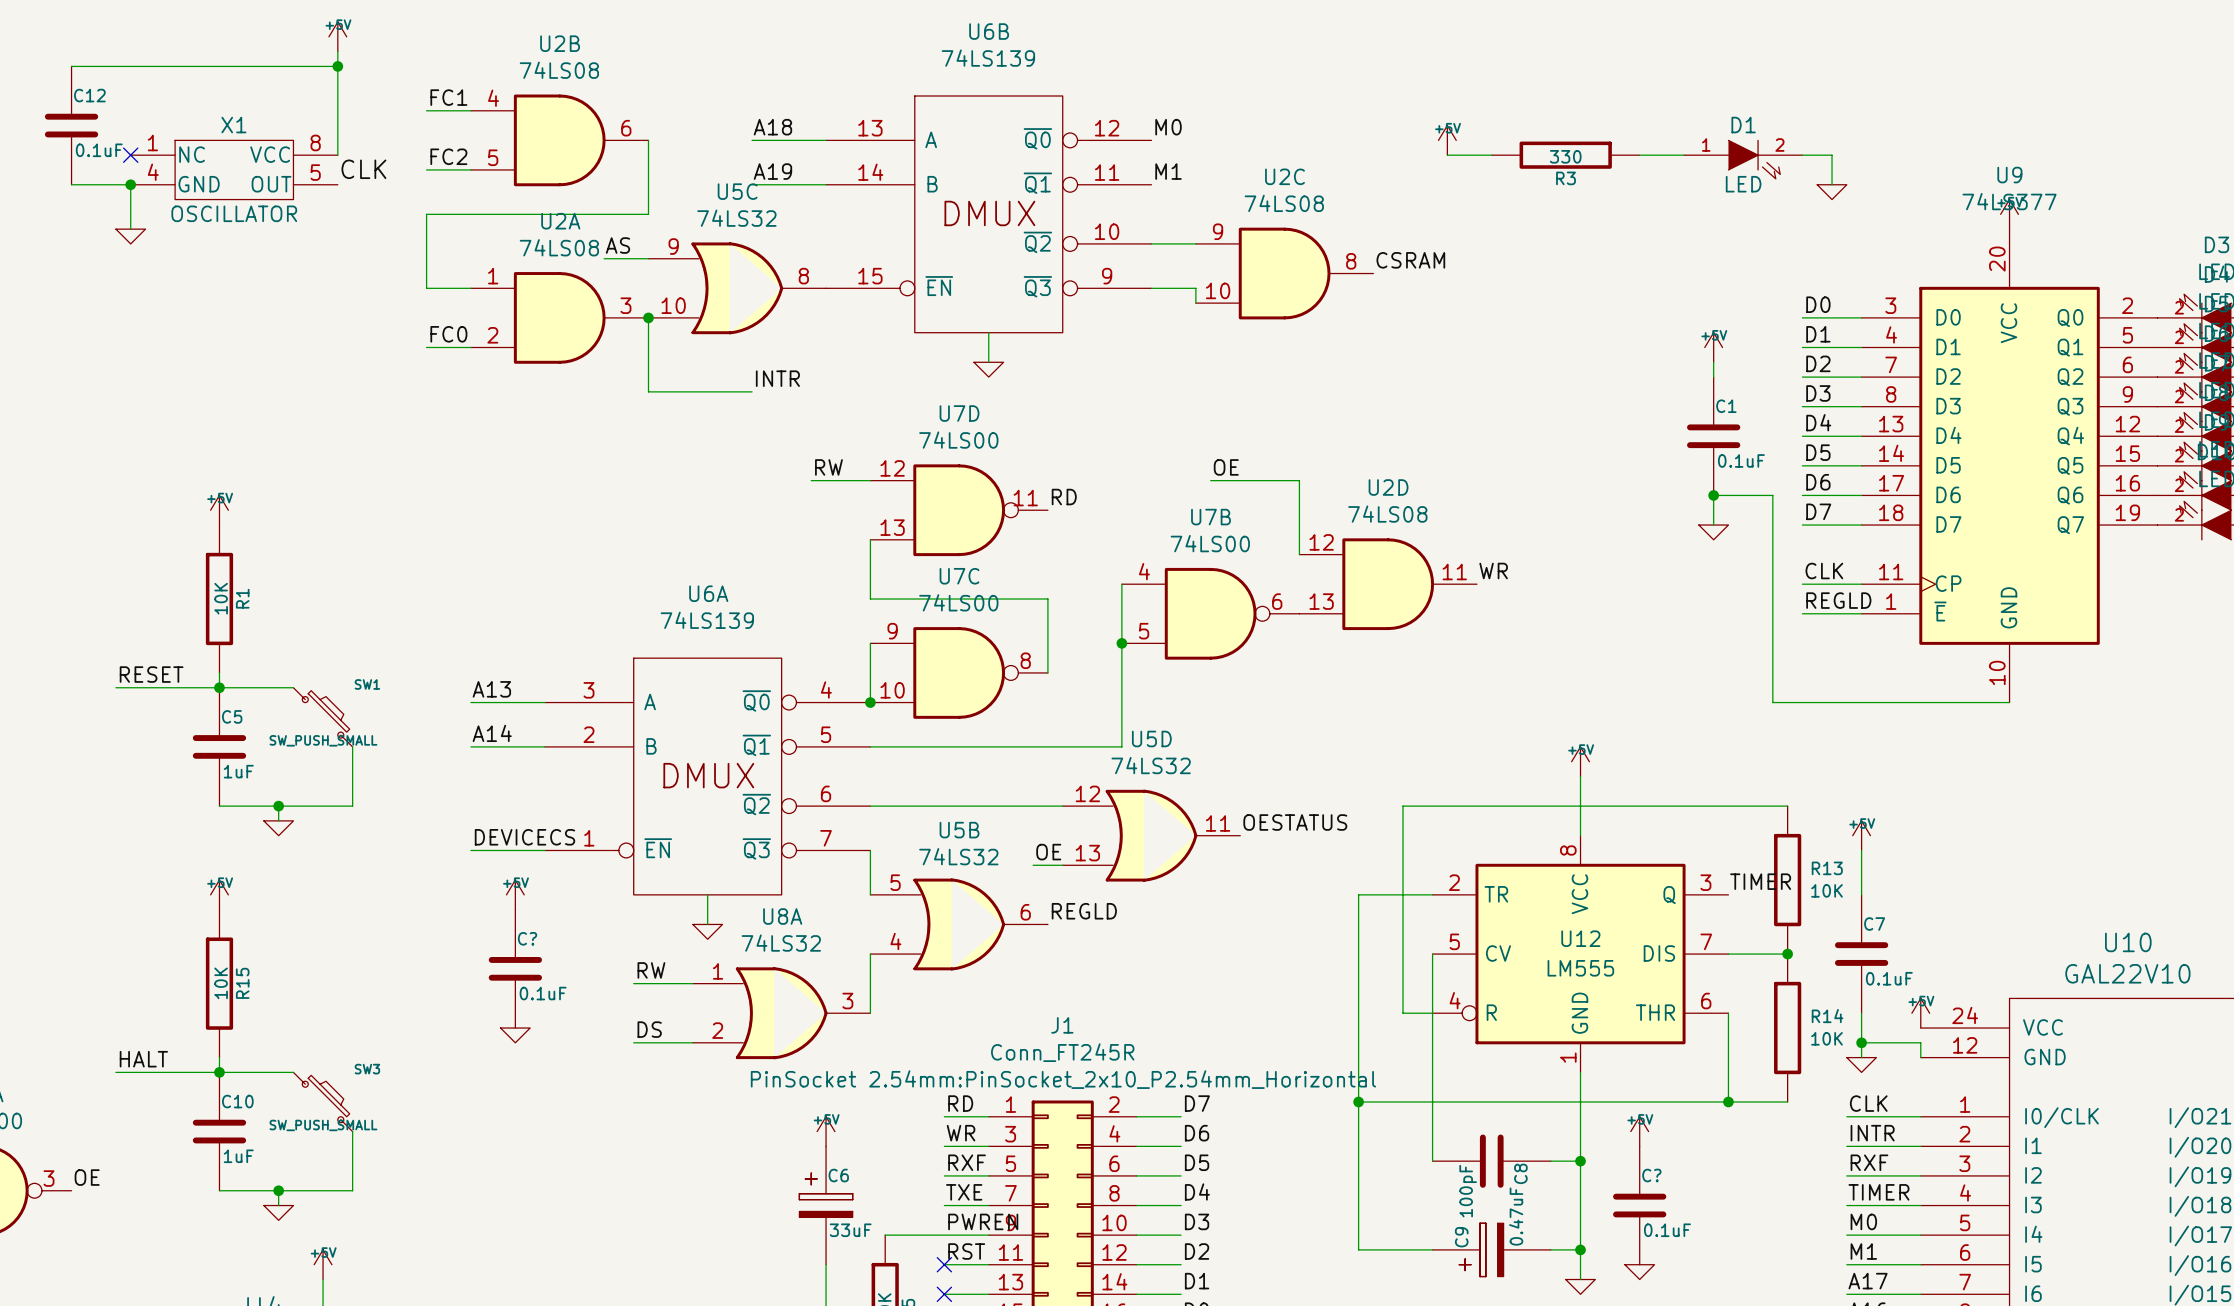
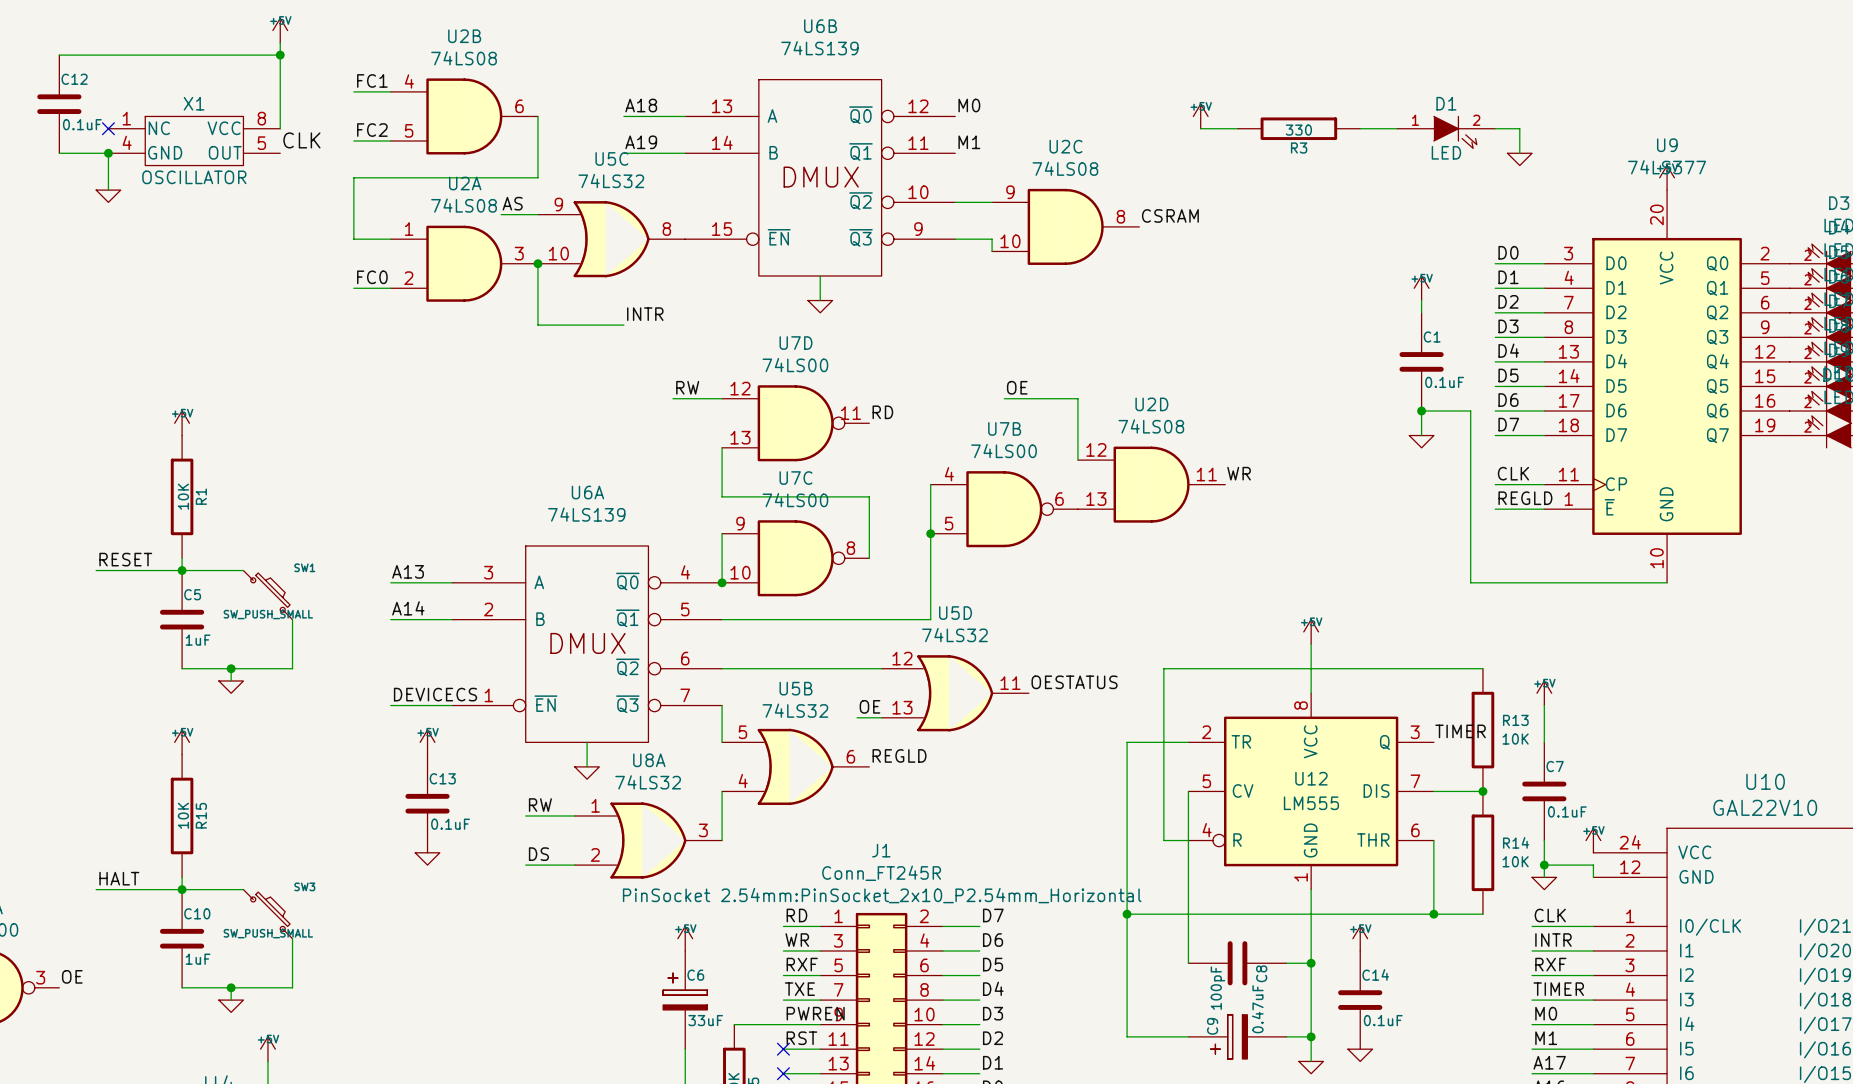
C? name: C? (527, 938) -> C13 (442, 778)
C? name: C? (1651, 1175) -> C14 (1375, 974)

